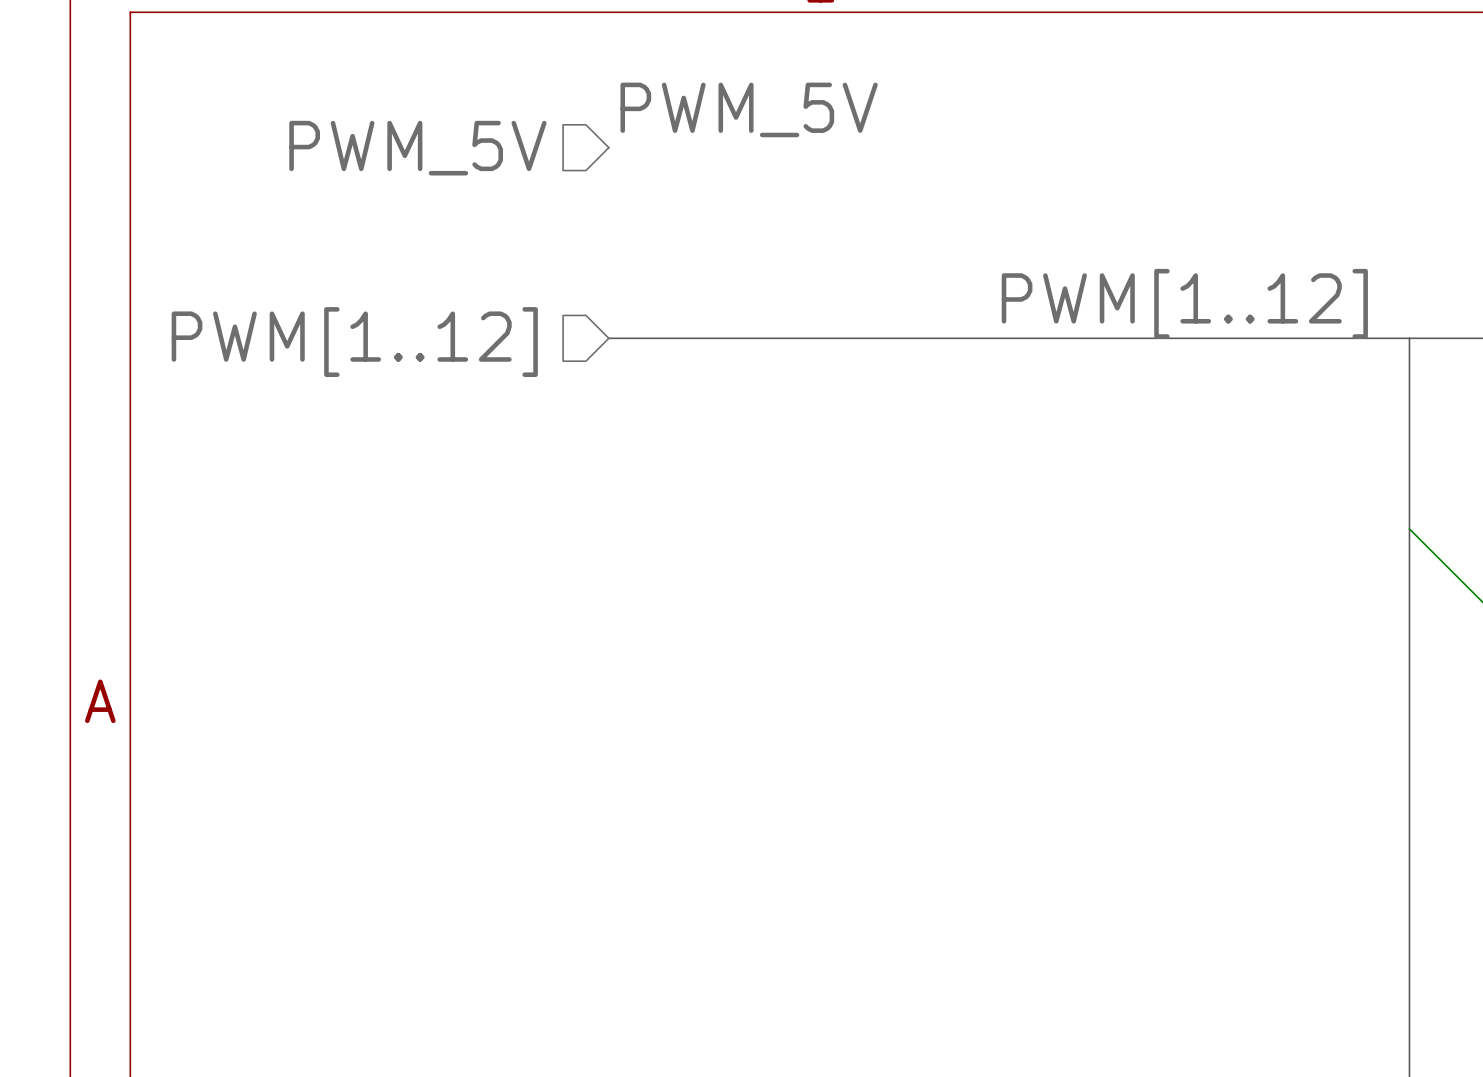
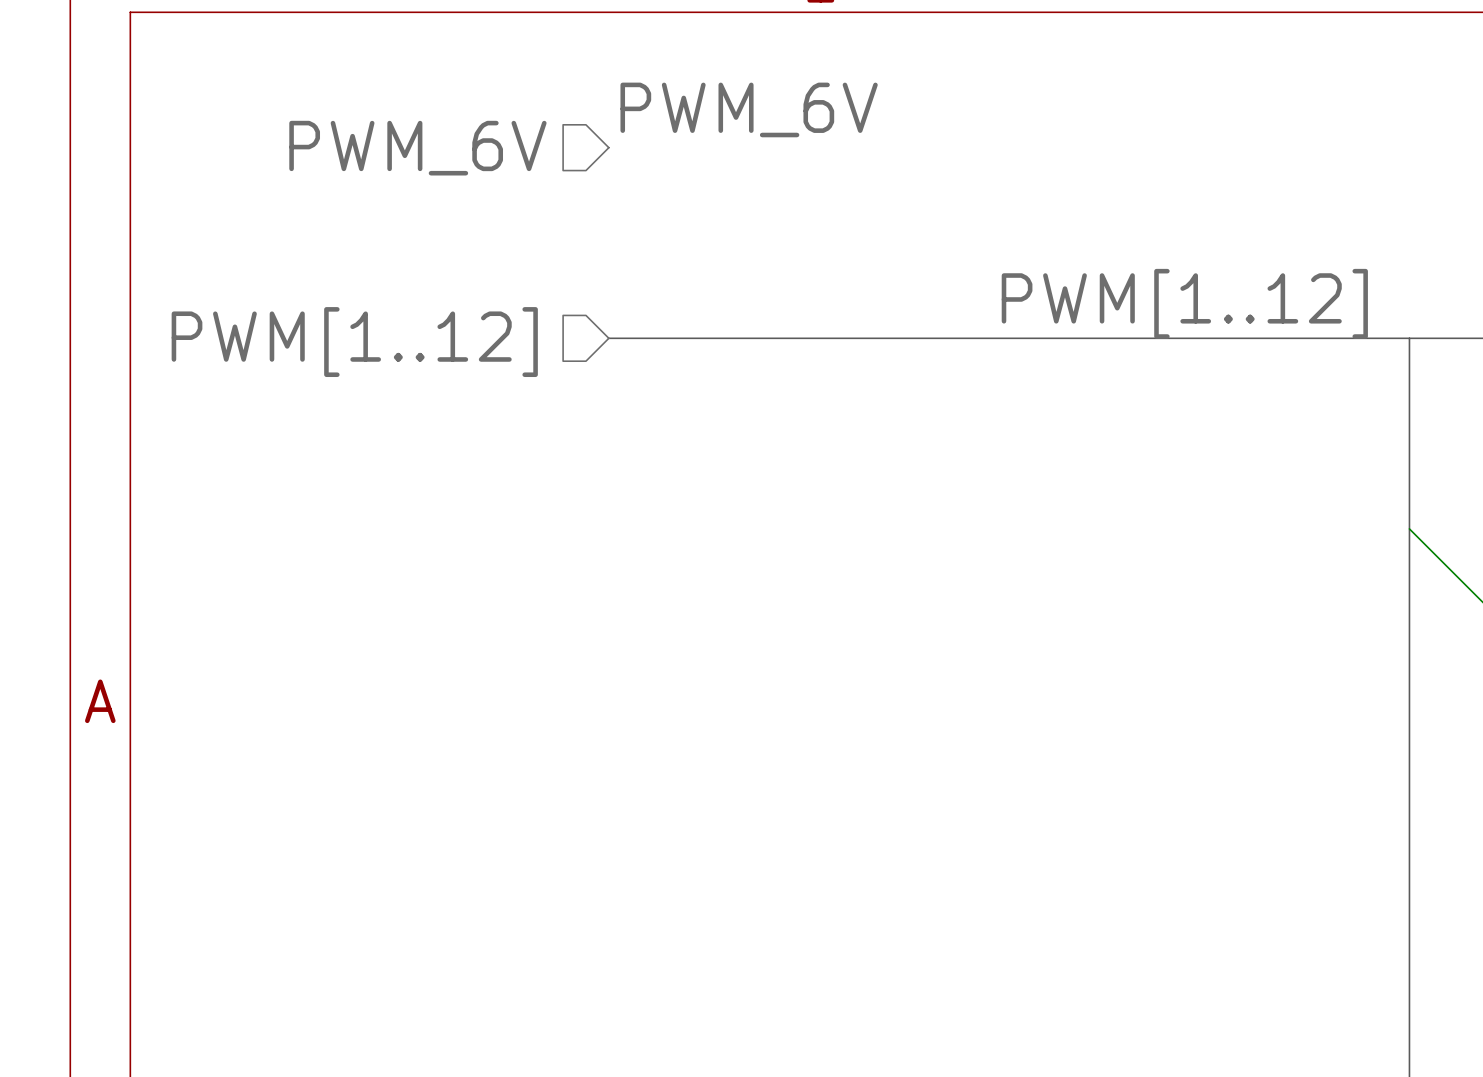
label: PWM_5V (749, 109) -> PWM_6V (749, 109)
hierarchical label: PWM_5V (417, 148) -> PWM_6V (417, 148)

